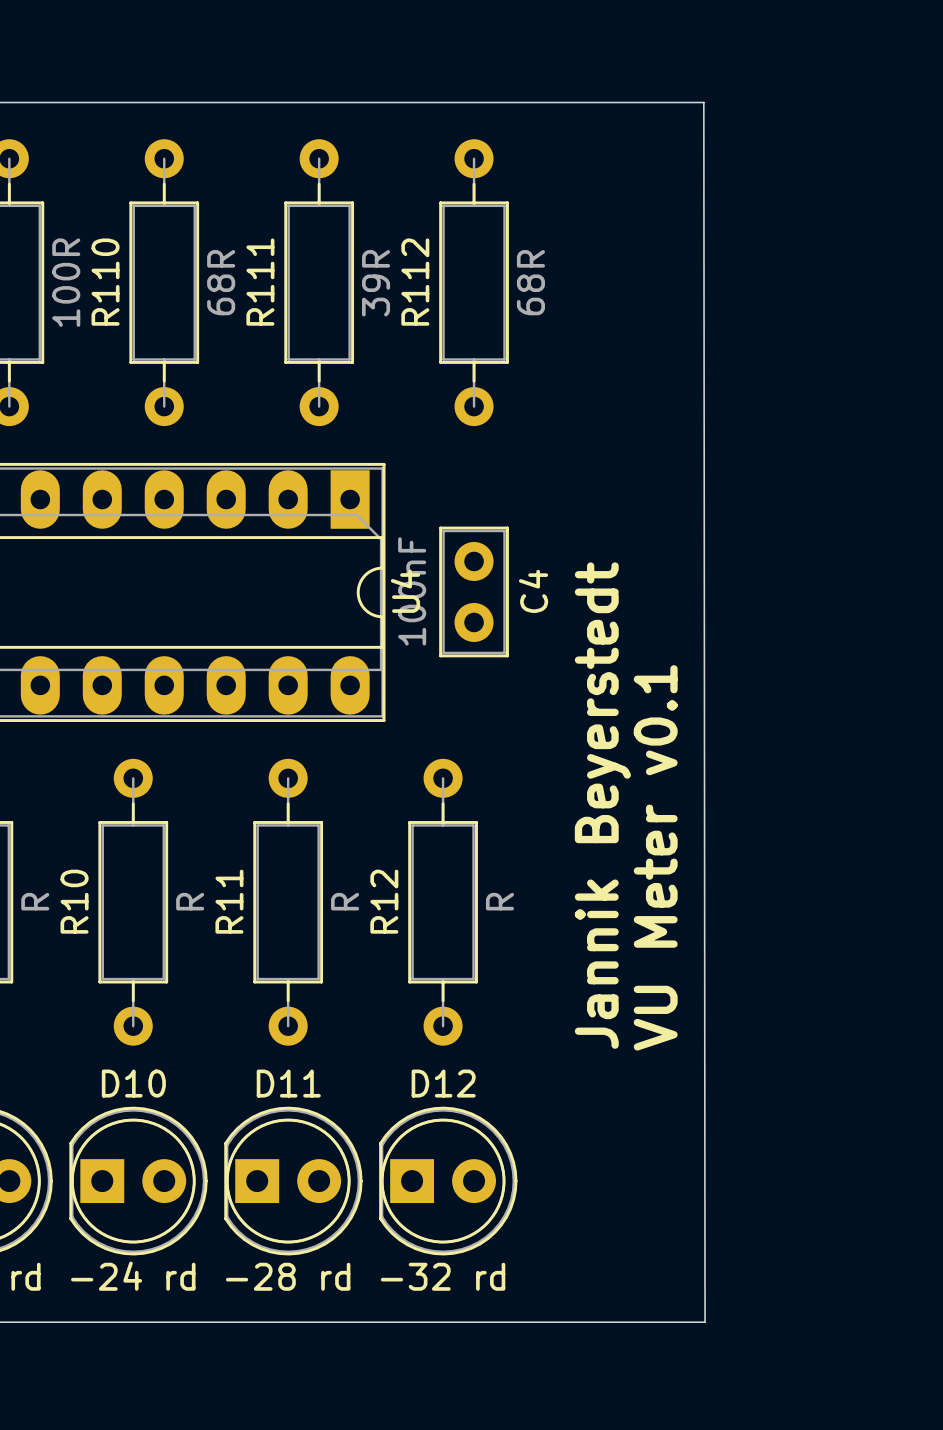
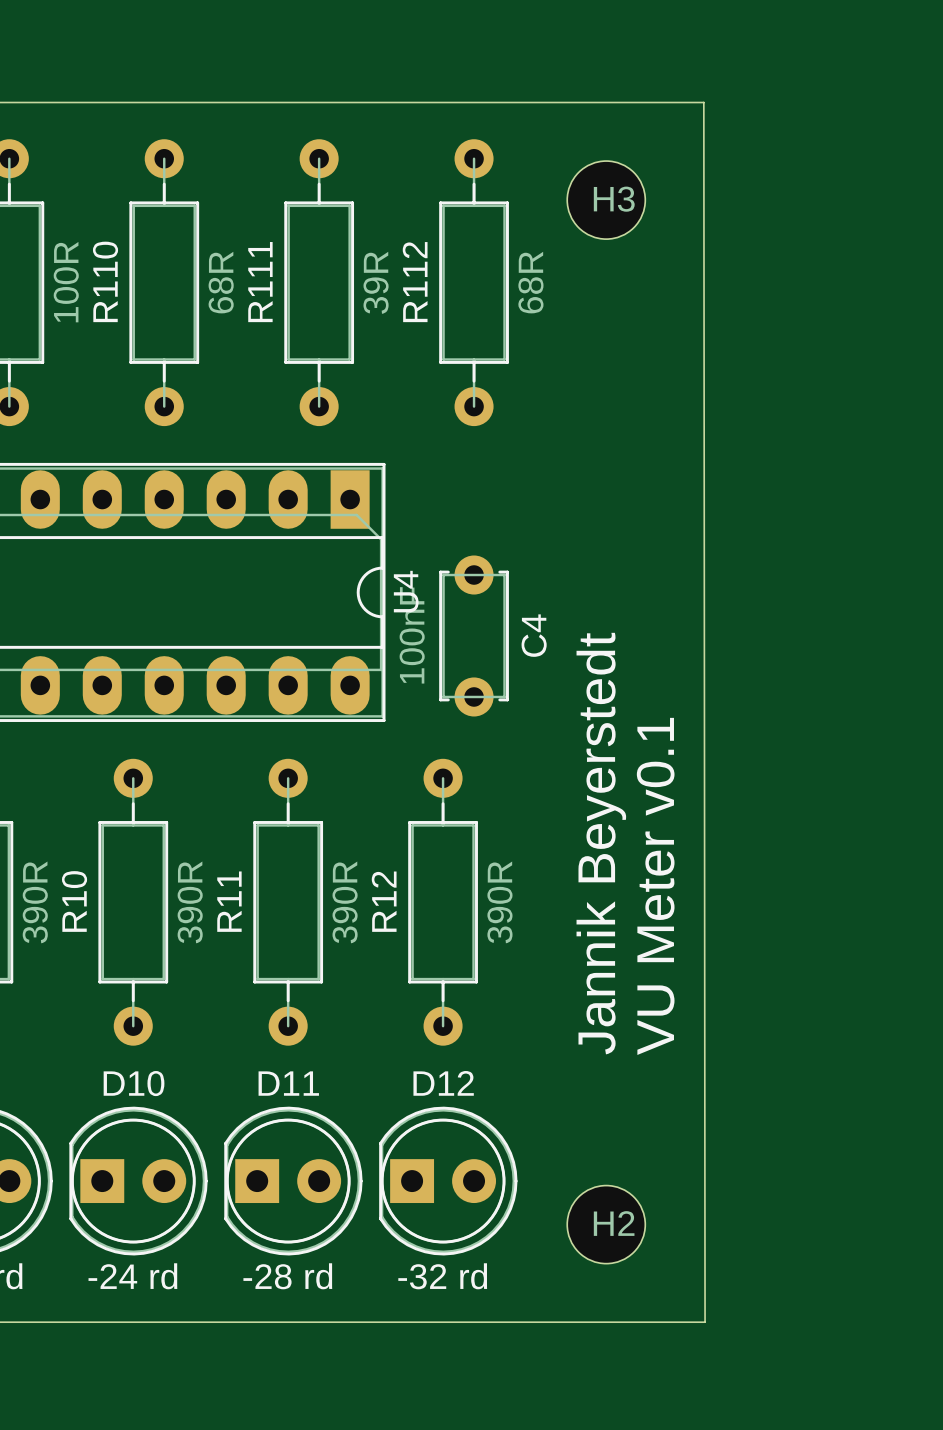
H3: none -> (606, 200)
C4 footprint: [439, 526, 509, 658] -> [439, 555, 509, 717]
part value: R (35, 901) -> 390R (35, 902)
R10 value: R (190, 901) -> 390R (190, 902)
R11 value: R (345, 901) -> 390R (345, 902)
R12 value: R (499, 901) -> 390R (499, 902)
H2: none -> (606, 1224)

